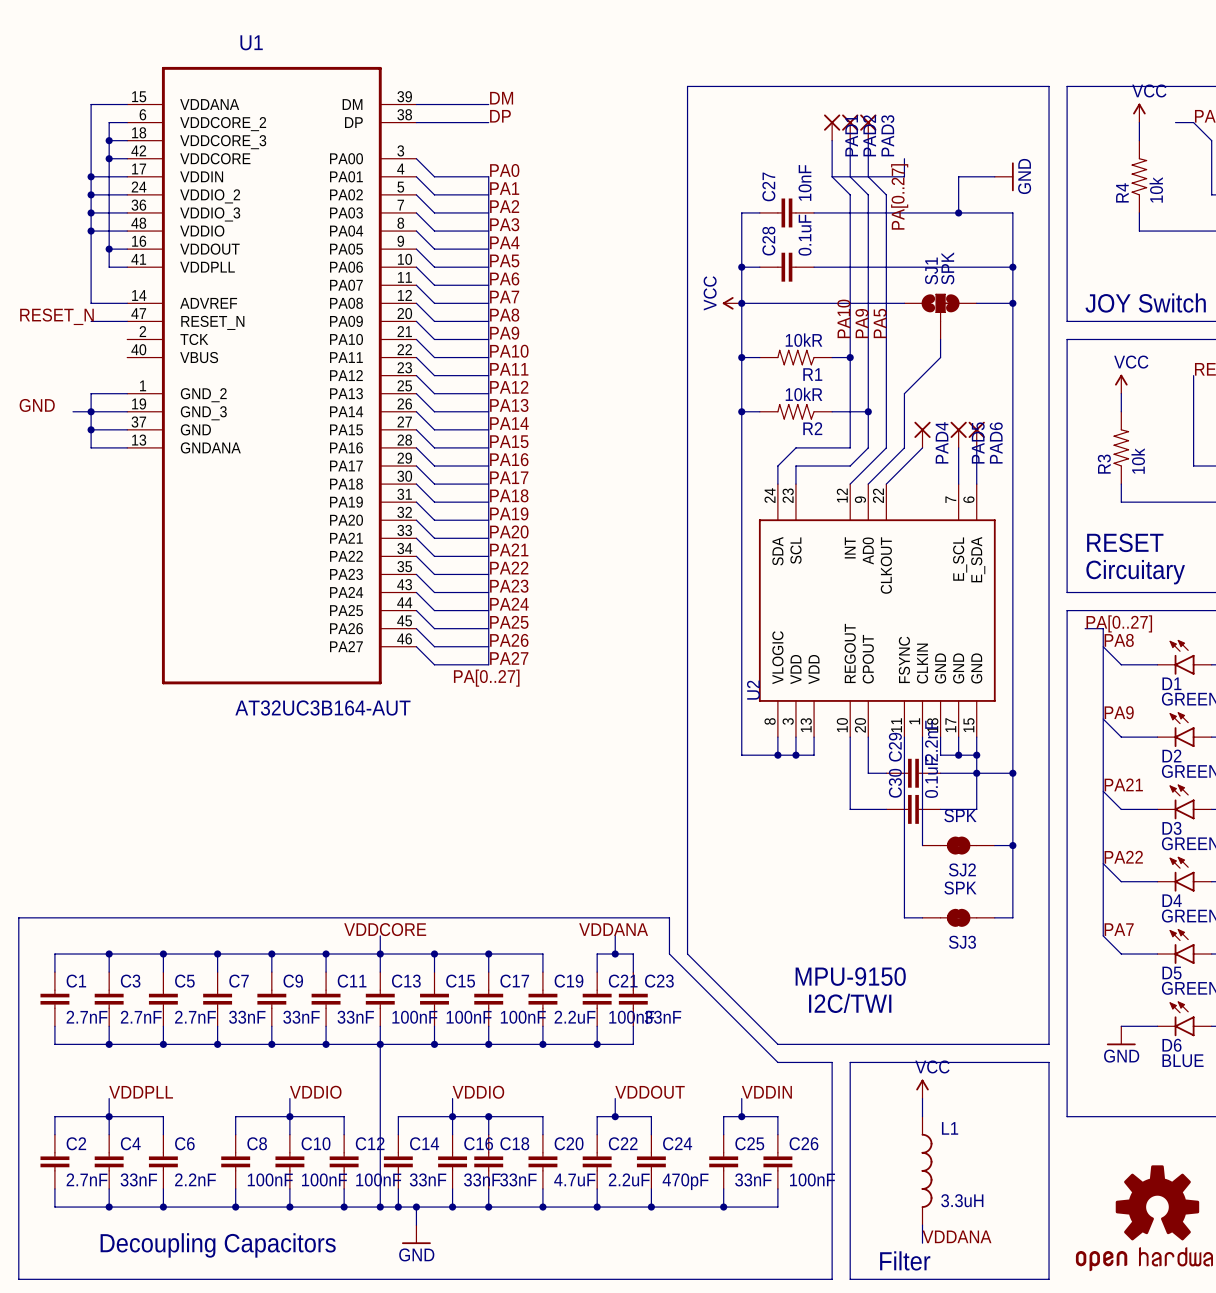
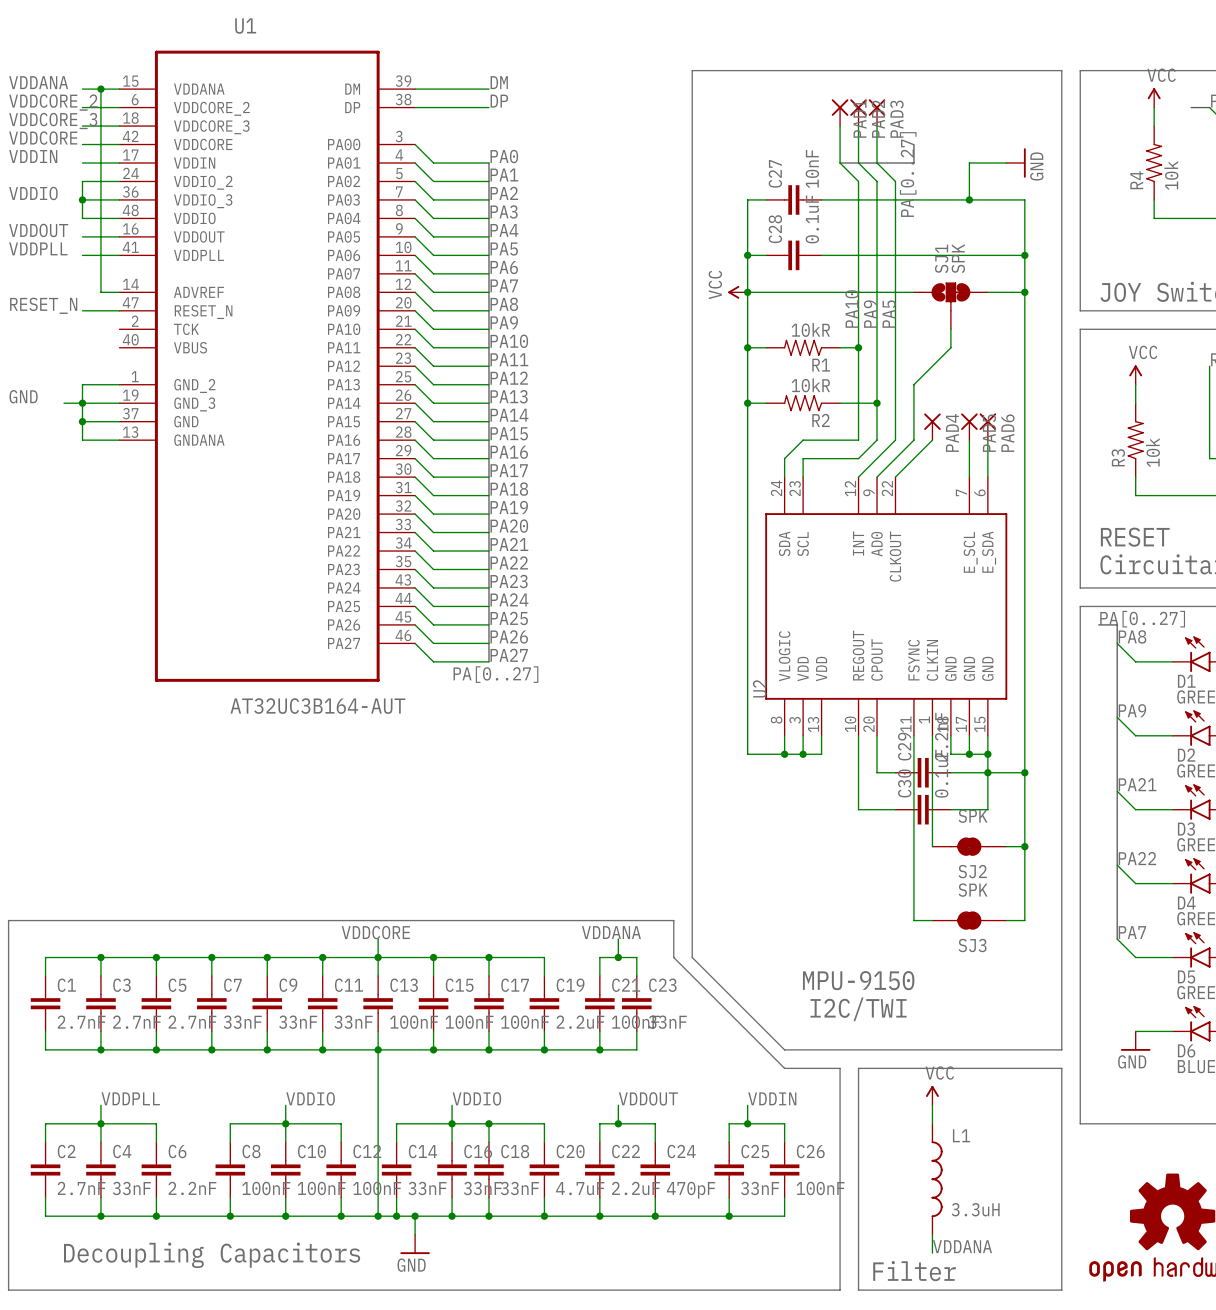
label: none -> VDDANA (38, 82)
wire: (91, 104) (91, 194) -> none
wire: none -> (100, 89) (100, 107) (82, 107)
junction: none -> (100, 89)
label: none -> VDDCORE_2 (53, 102)
label: none -> VDDCORE_3 (53, 121)
wire: none -> (82, 126) (100, 126)
junction: (109, 140) -> none
label: none -> VDDCORE (43, 138)
wire: none -> (82, 144) (100, 144)
junction: (109, 158) -> none
label: none -> VDDIN (33, 156)
junction: (91, 176) -> none
junction: (91, 194) -> none
label: none -> VDDIO (33, 193)
wire: (91, 231) (91, 303) (109, 303) -> (82, 255) (100, 255) (100, 292)
junction: (91, 231) -> none
label: none -> VDDOUT (38, 230)
wire: none -> (82, 236) (100, 236)
junction: (109, 249) -> none
label: none -> VDDPLL (38, 248)

